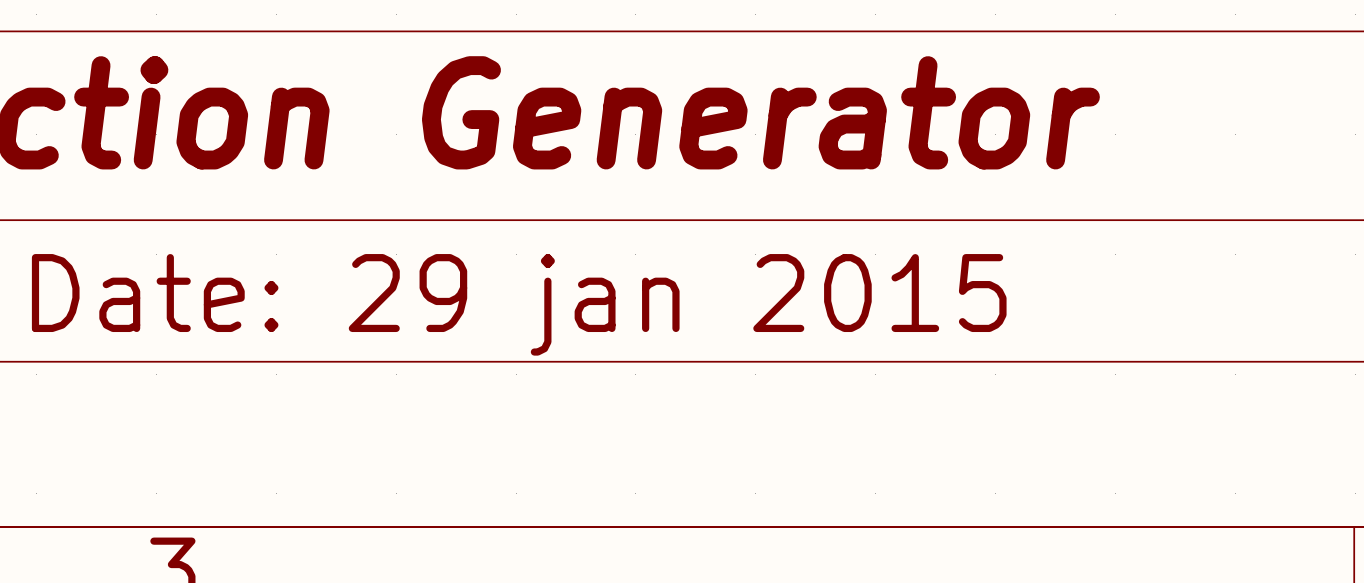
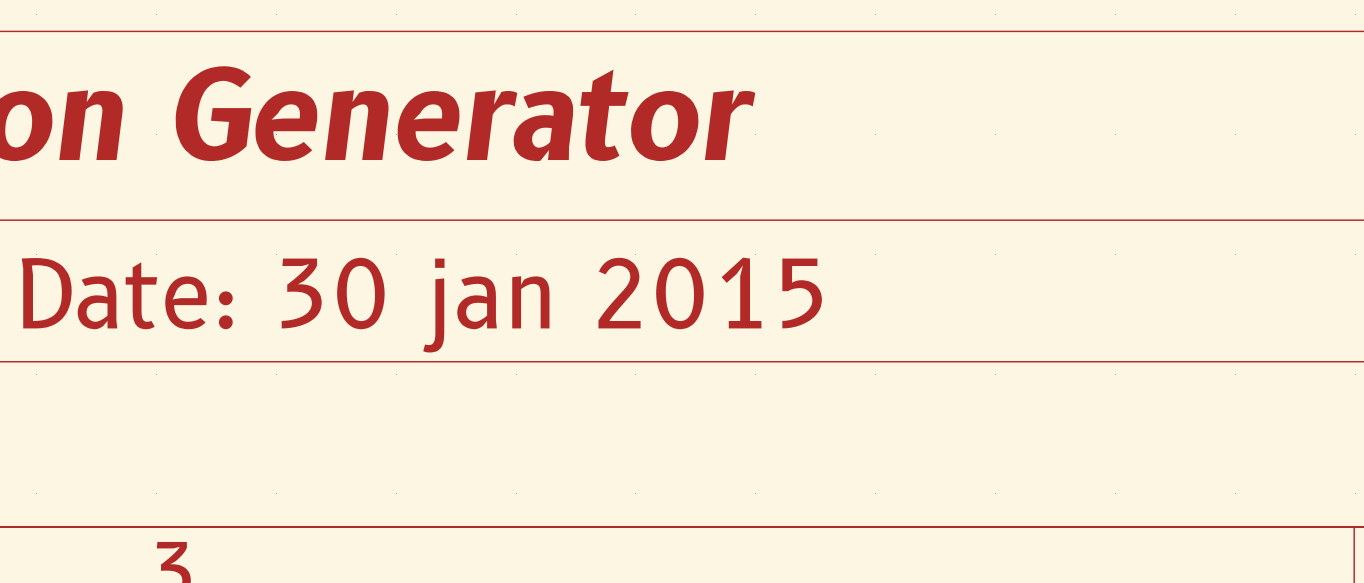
title block: Date: 29 jan 2015 (519, 304) -> Date: 30 jan 2015 (421, 305)

